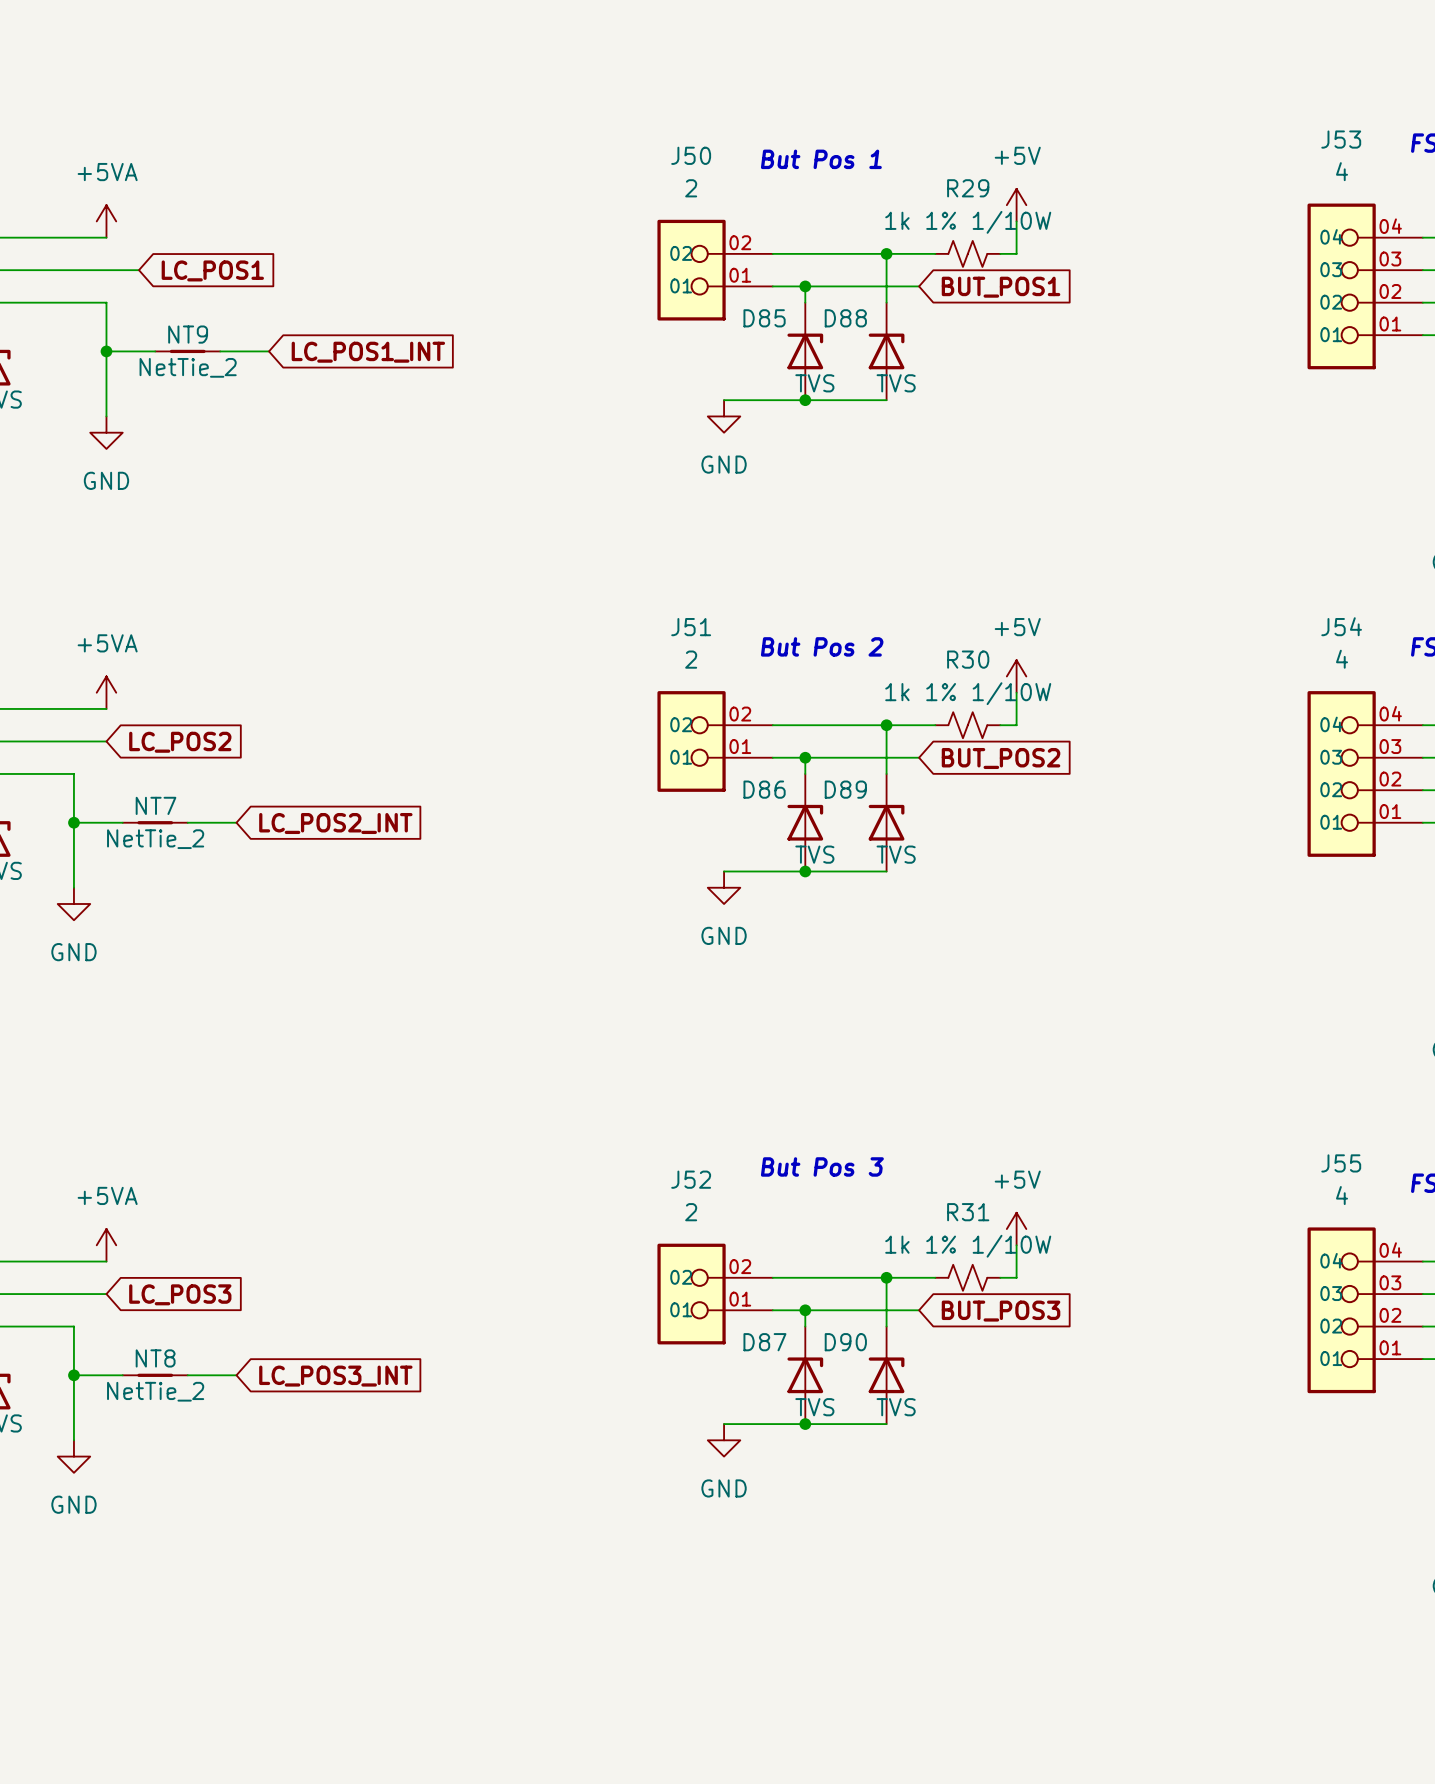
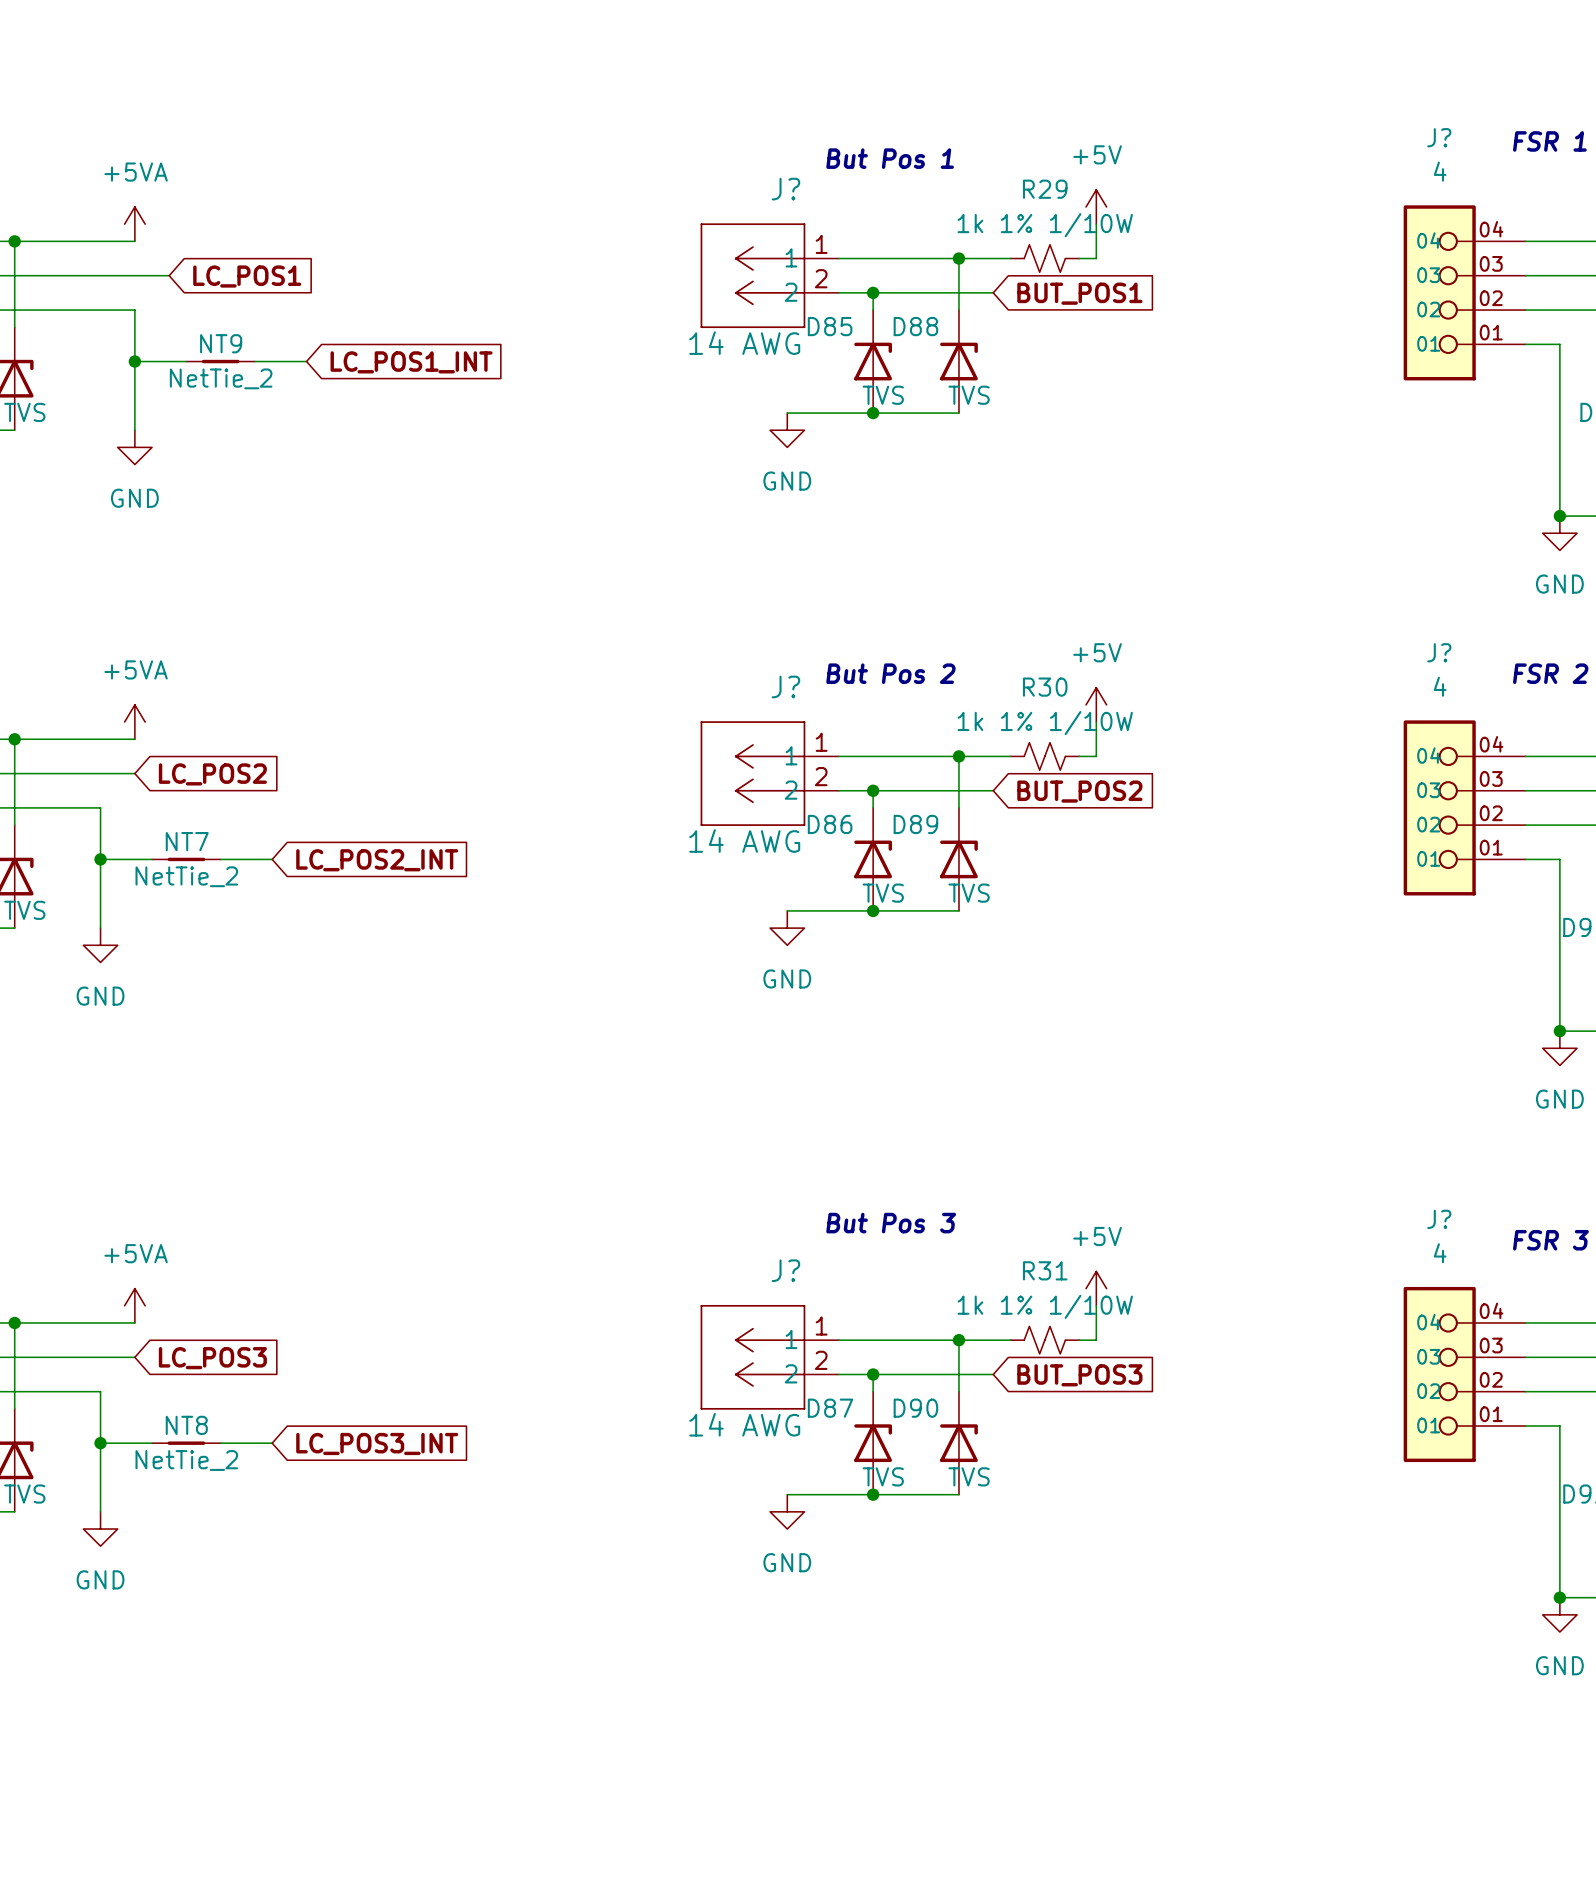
J53 name: J53 (1341, 139) -> J? (1439, 137)
J?: none -> 14 AWG (769, 275)
J50: 2 (715, 270) -> none
J54 name: J54 (1341, 626) -> J? (1439, 652)
J?: none -> 14 AWG (769, 773)
J51: 2 (715, 741) -> none
J55 name: J55 (1341, 1163) -> J? (1439, 1219)
J?: none -> 14 AWG (769, 1357)
J52: 2 (715, 1294) -> none

